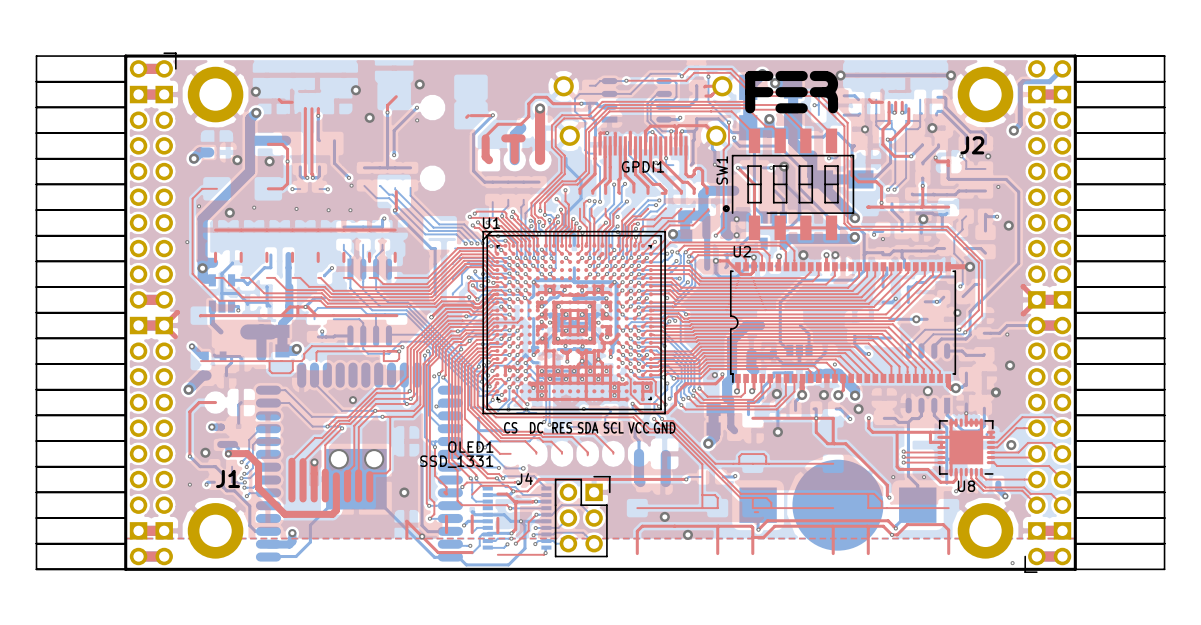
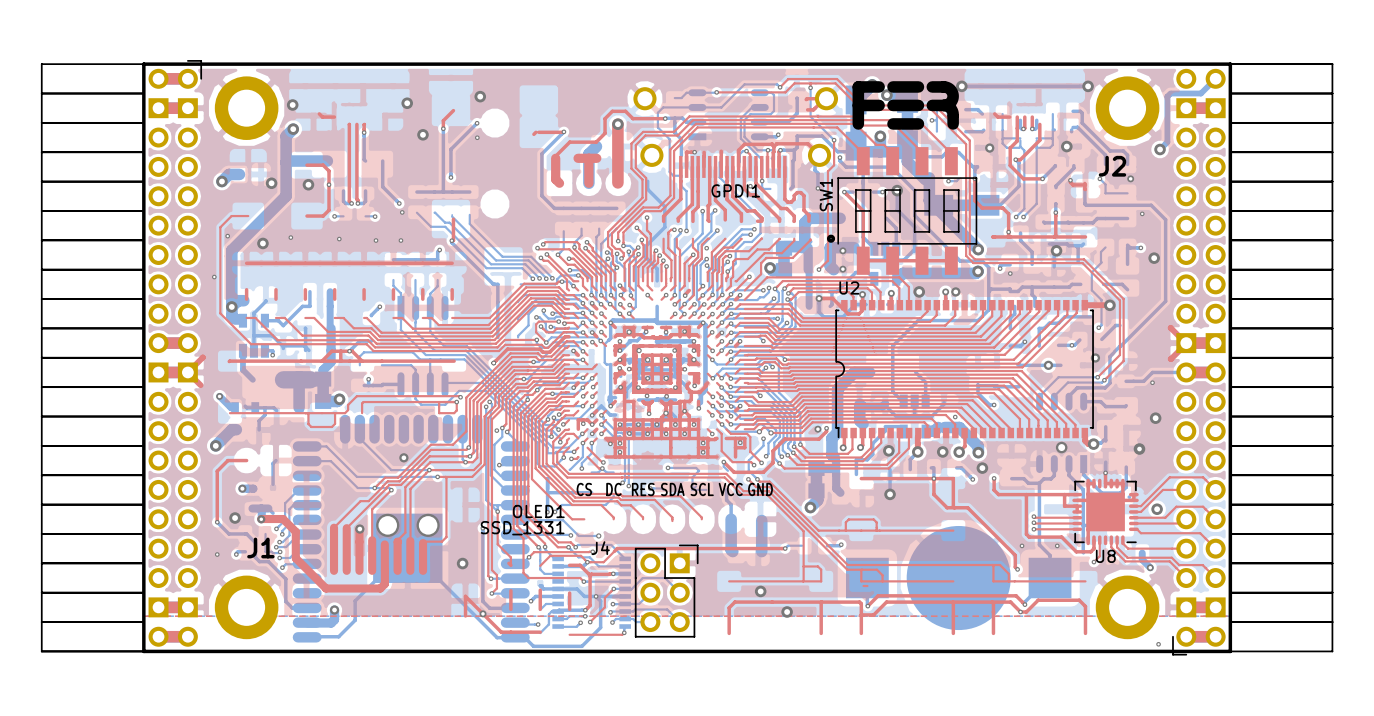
U1: (574, 322) -> none

